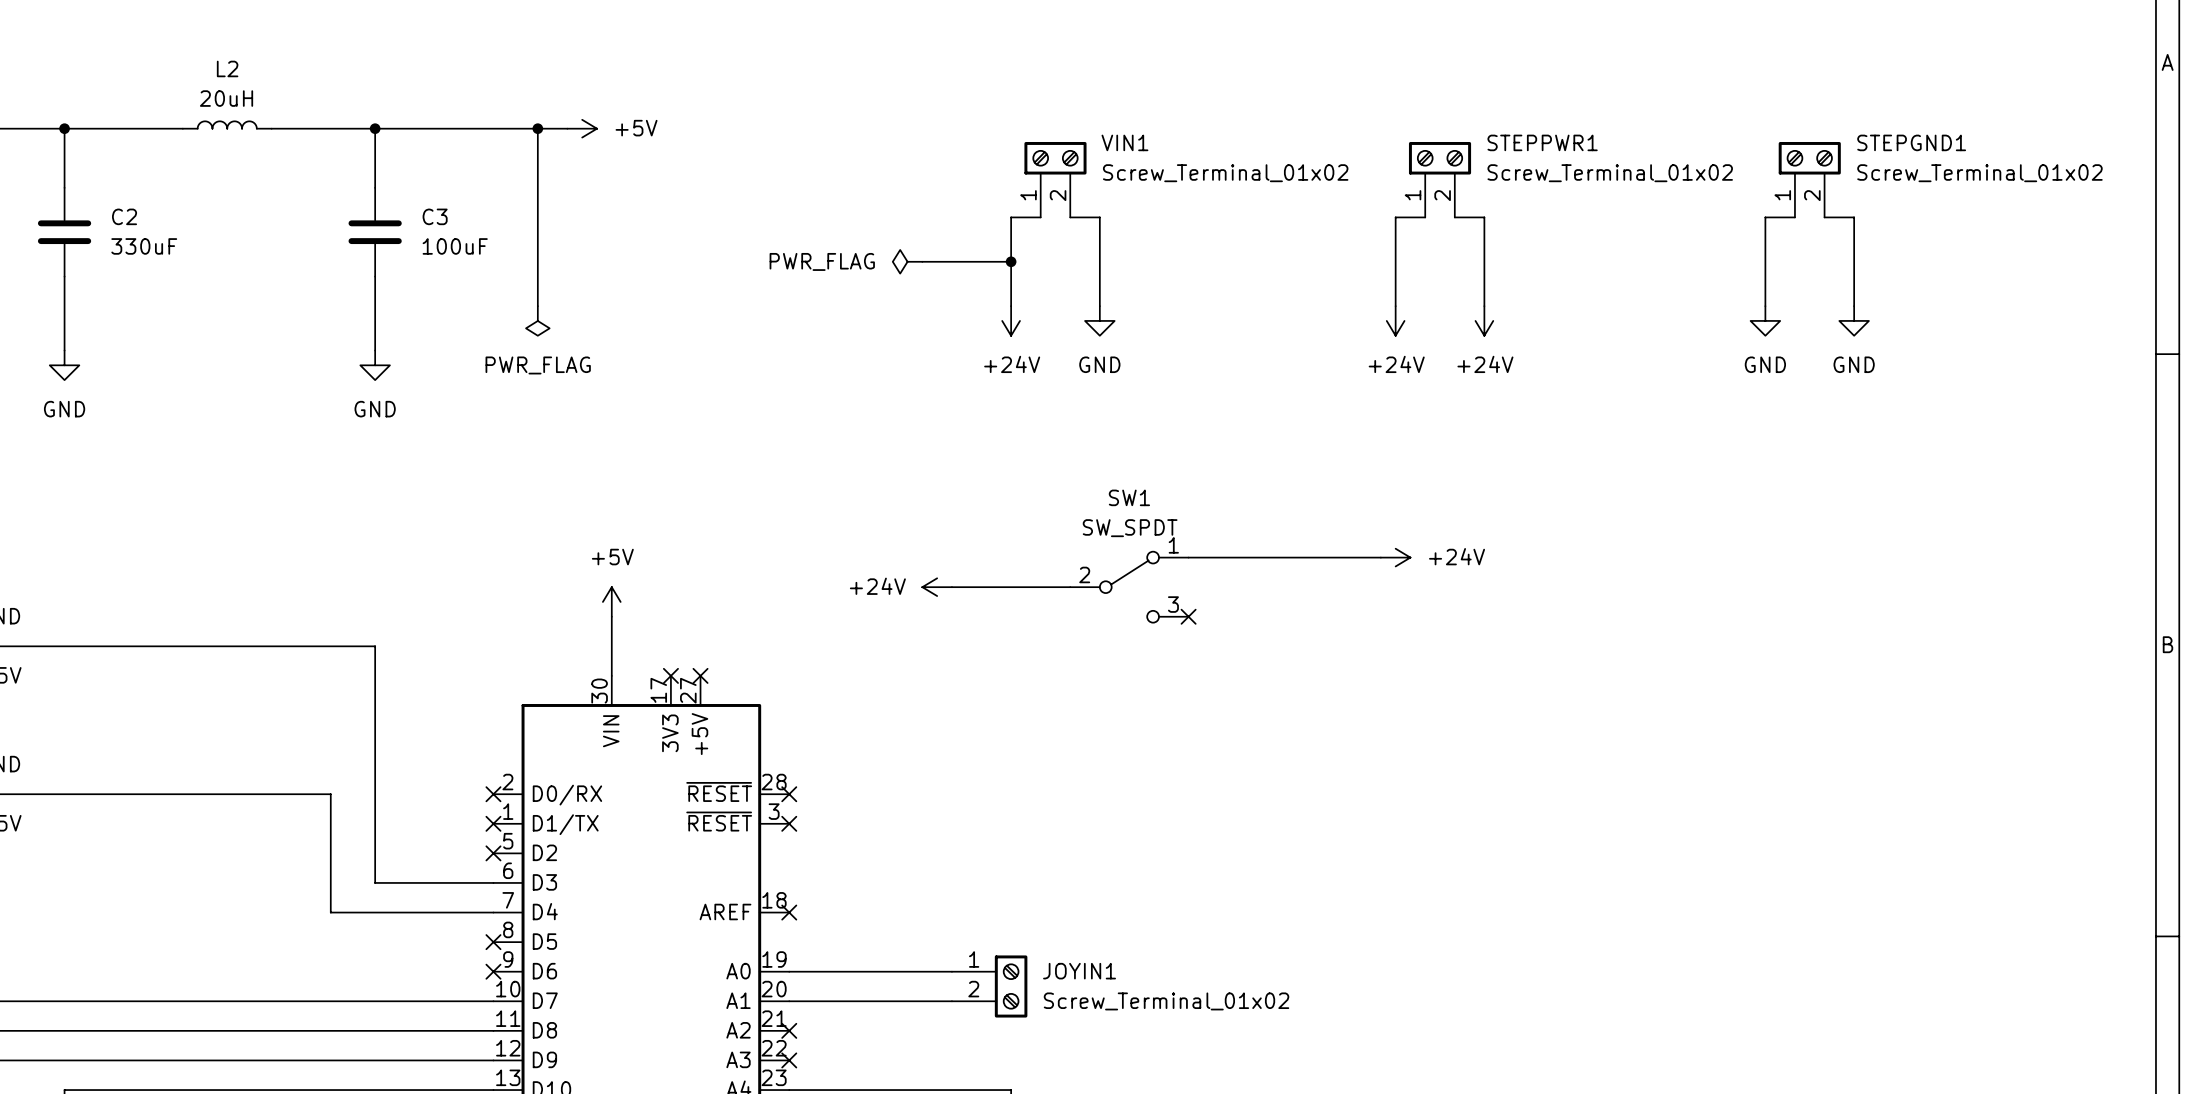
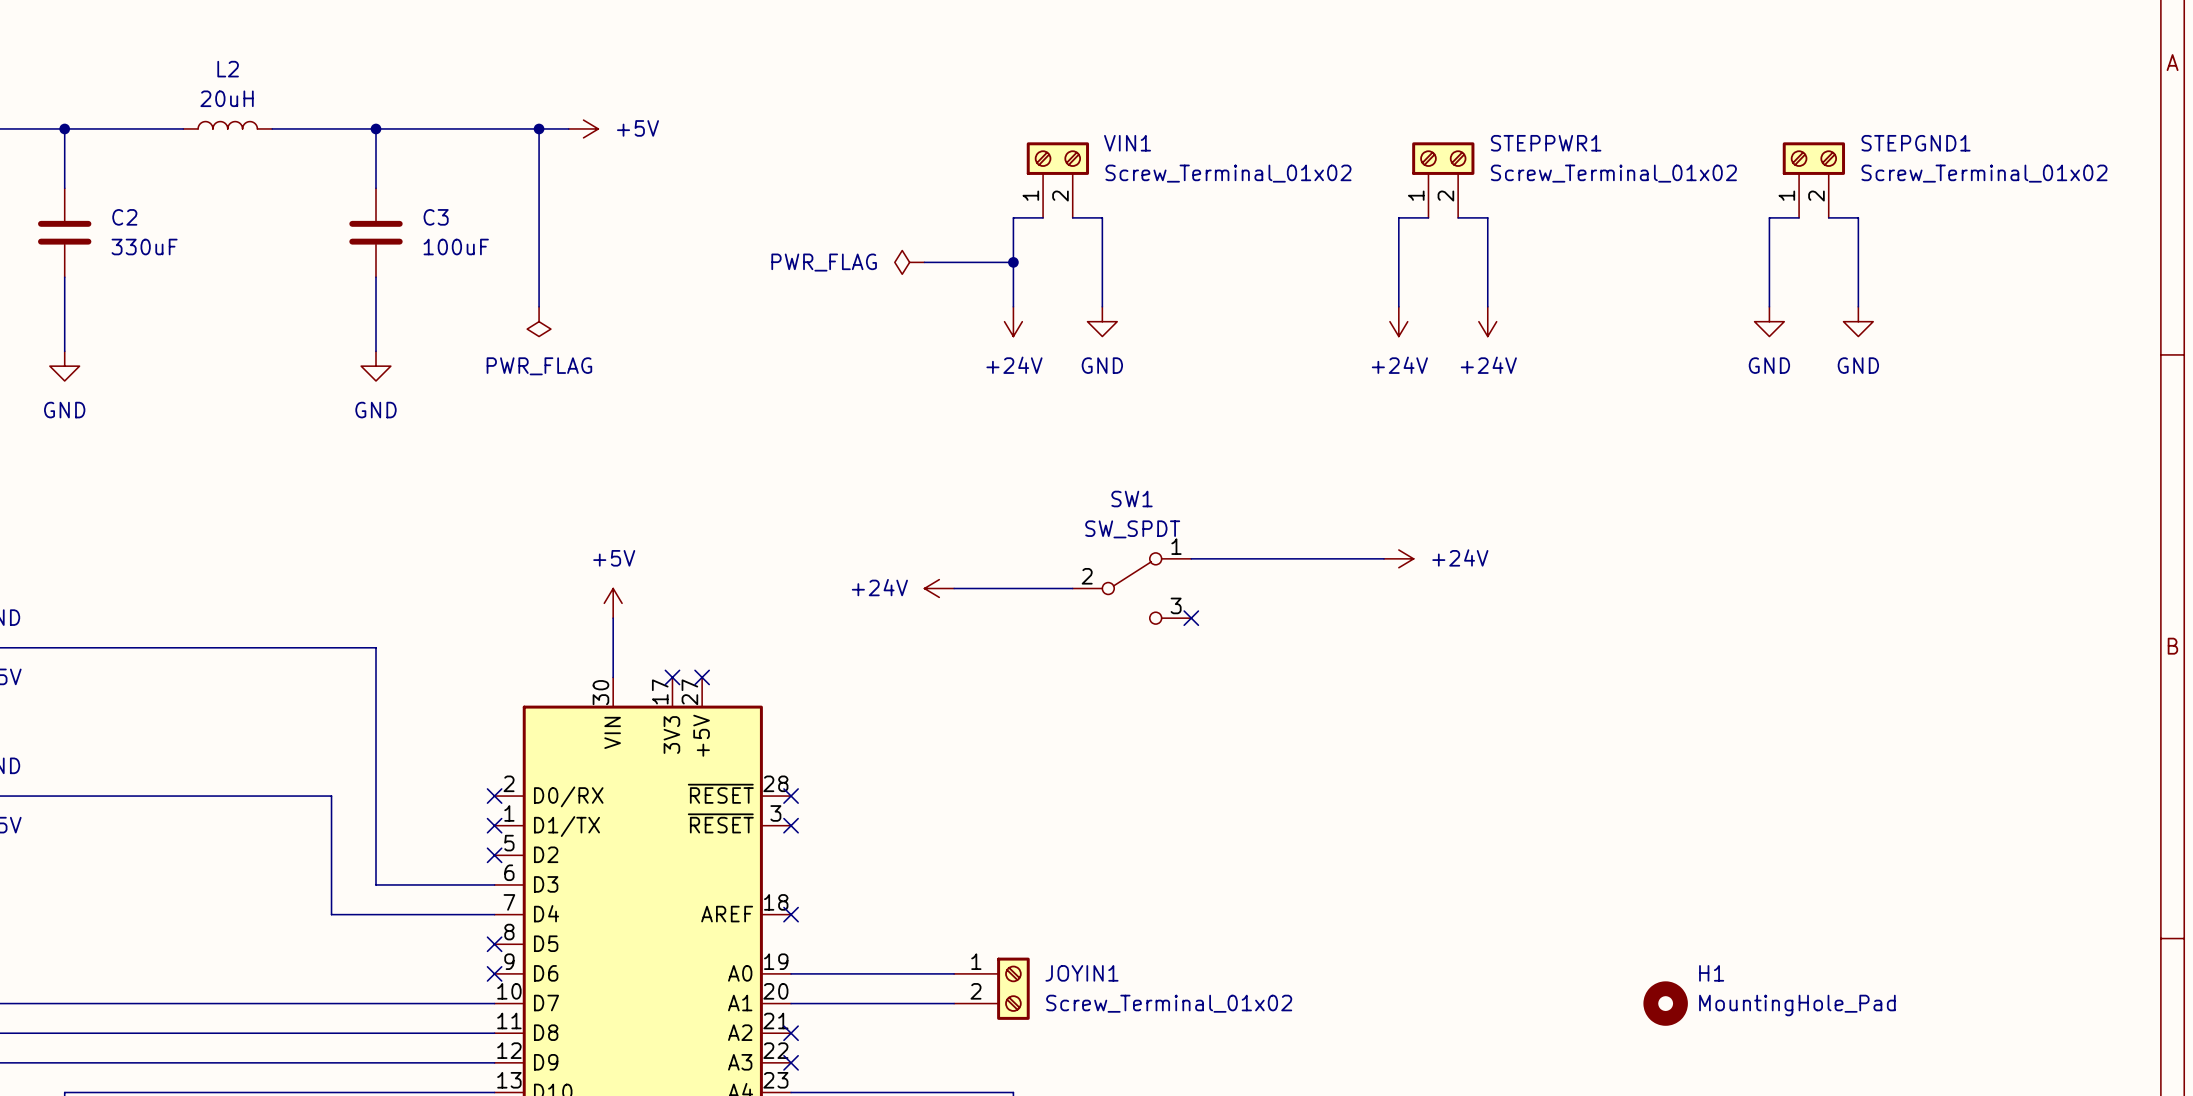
H1: none -> MountingHole_Pad (1665, 1003)

